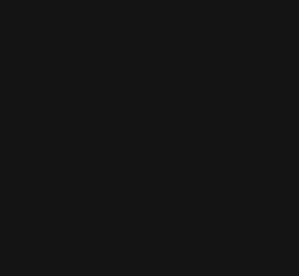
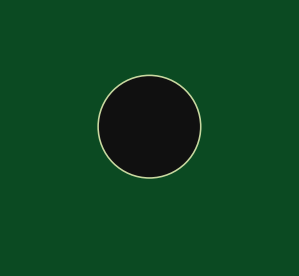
part: none -> (149, 126)

